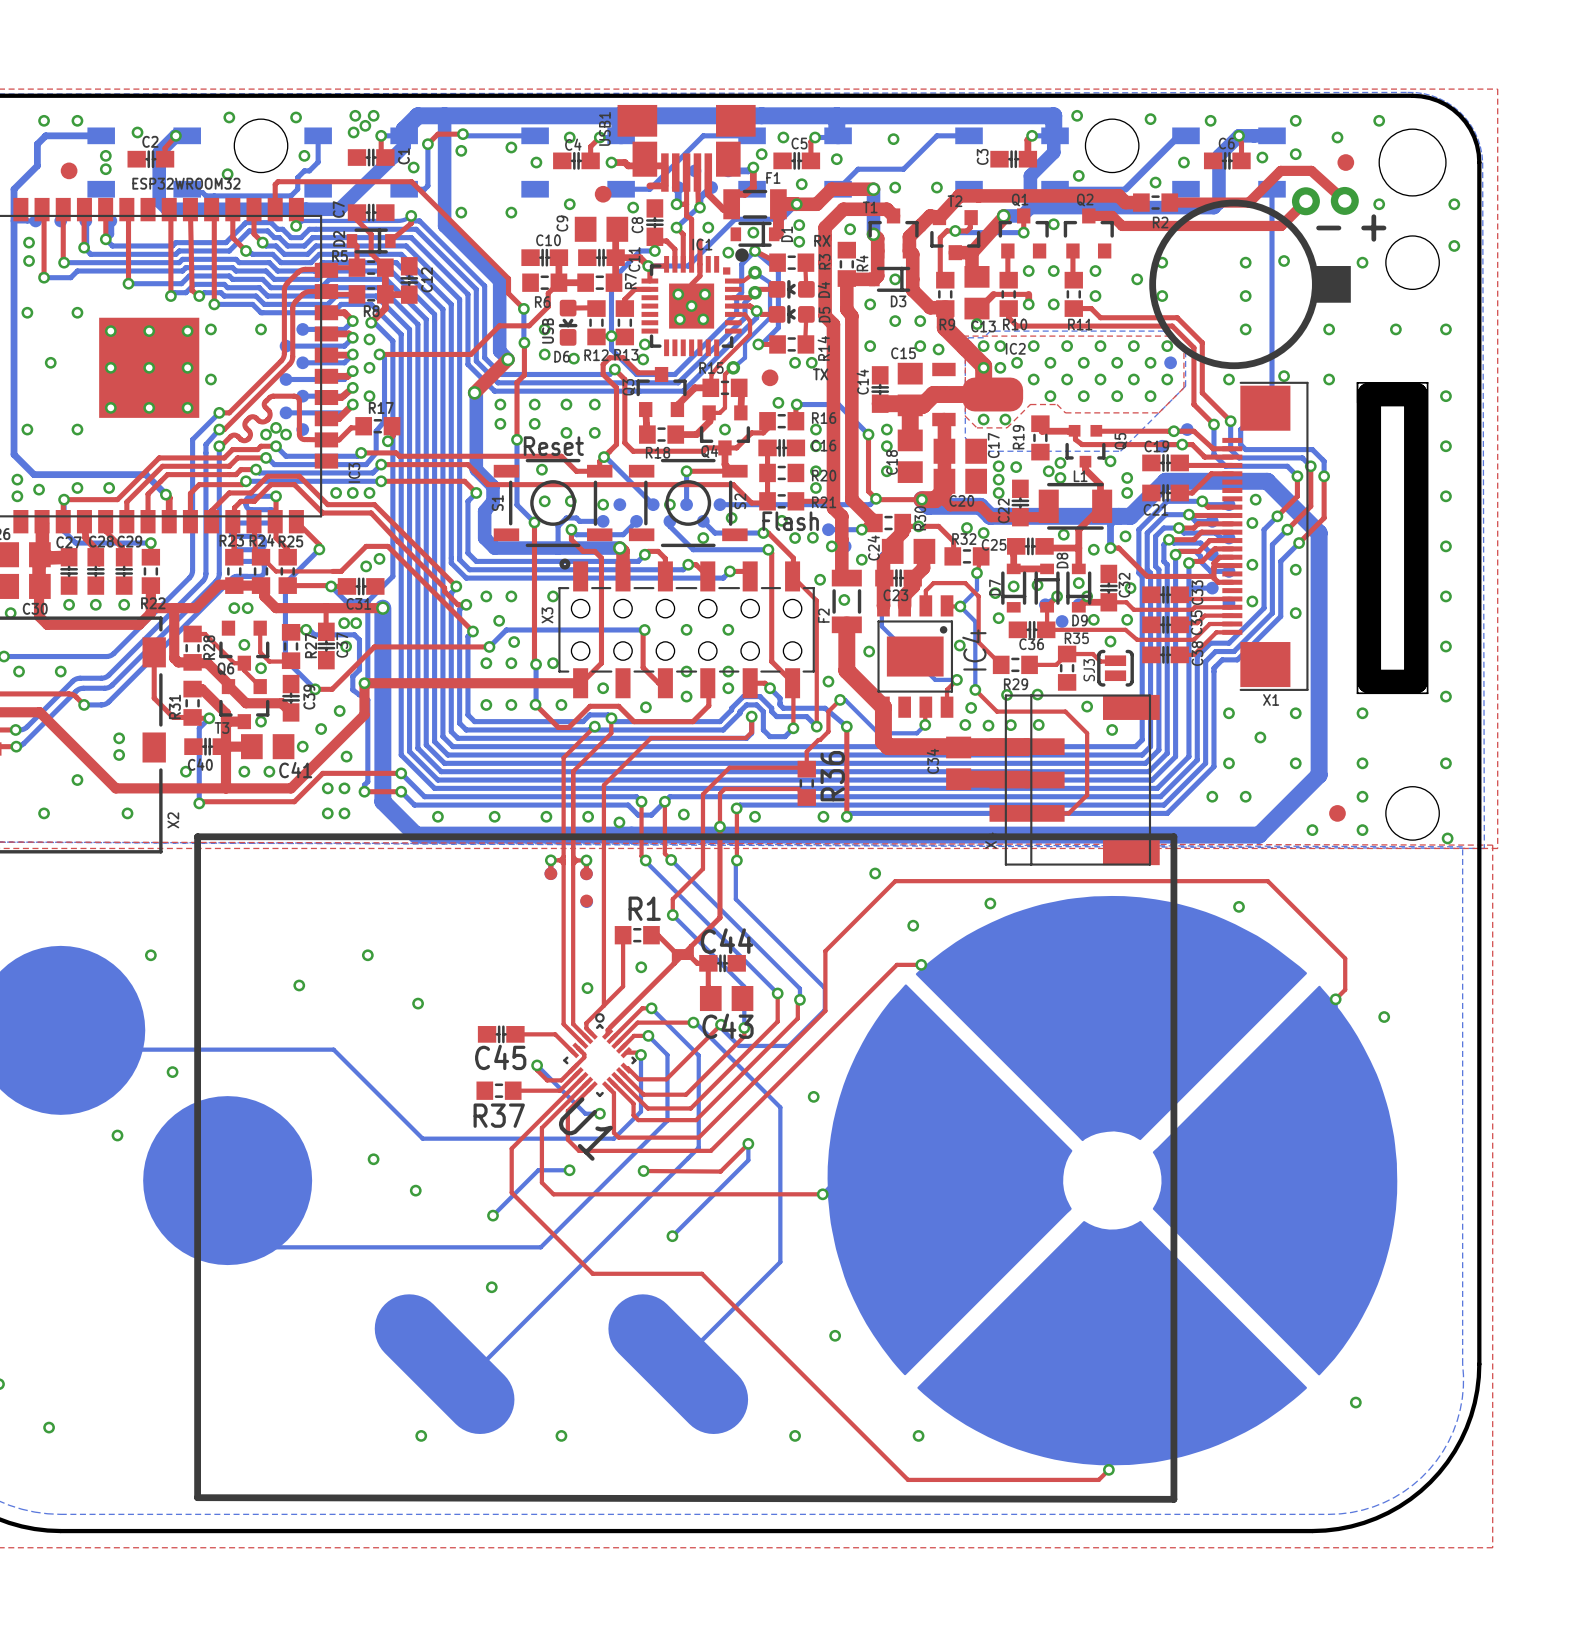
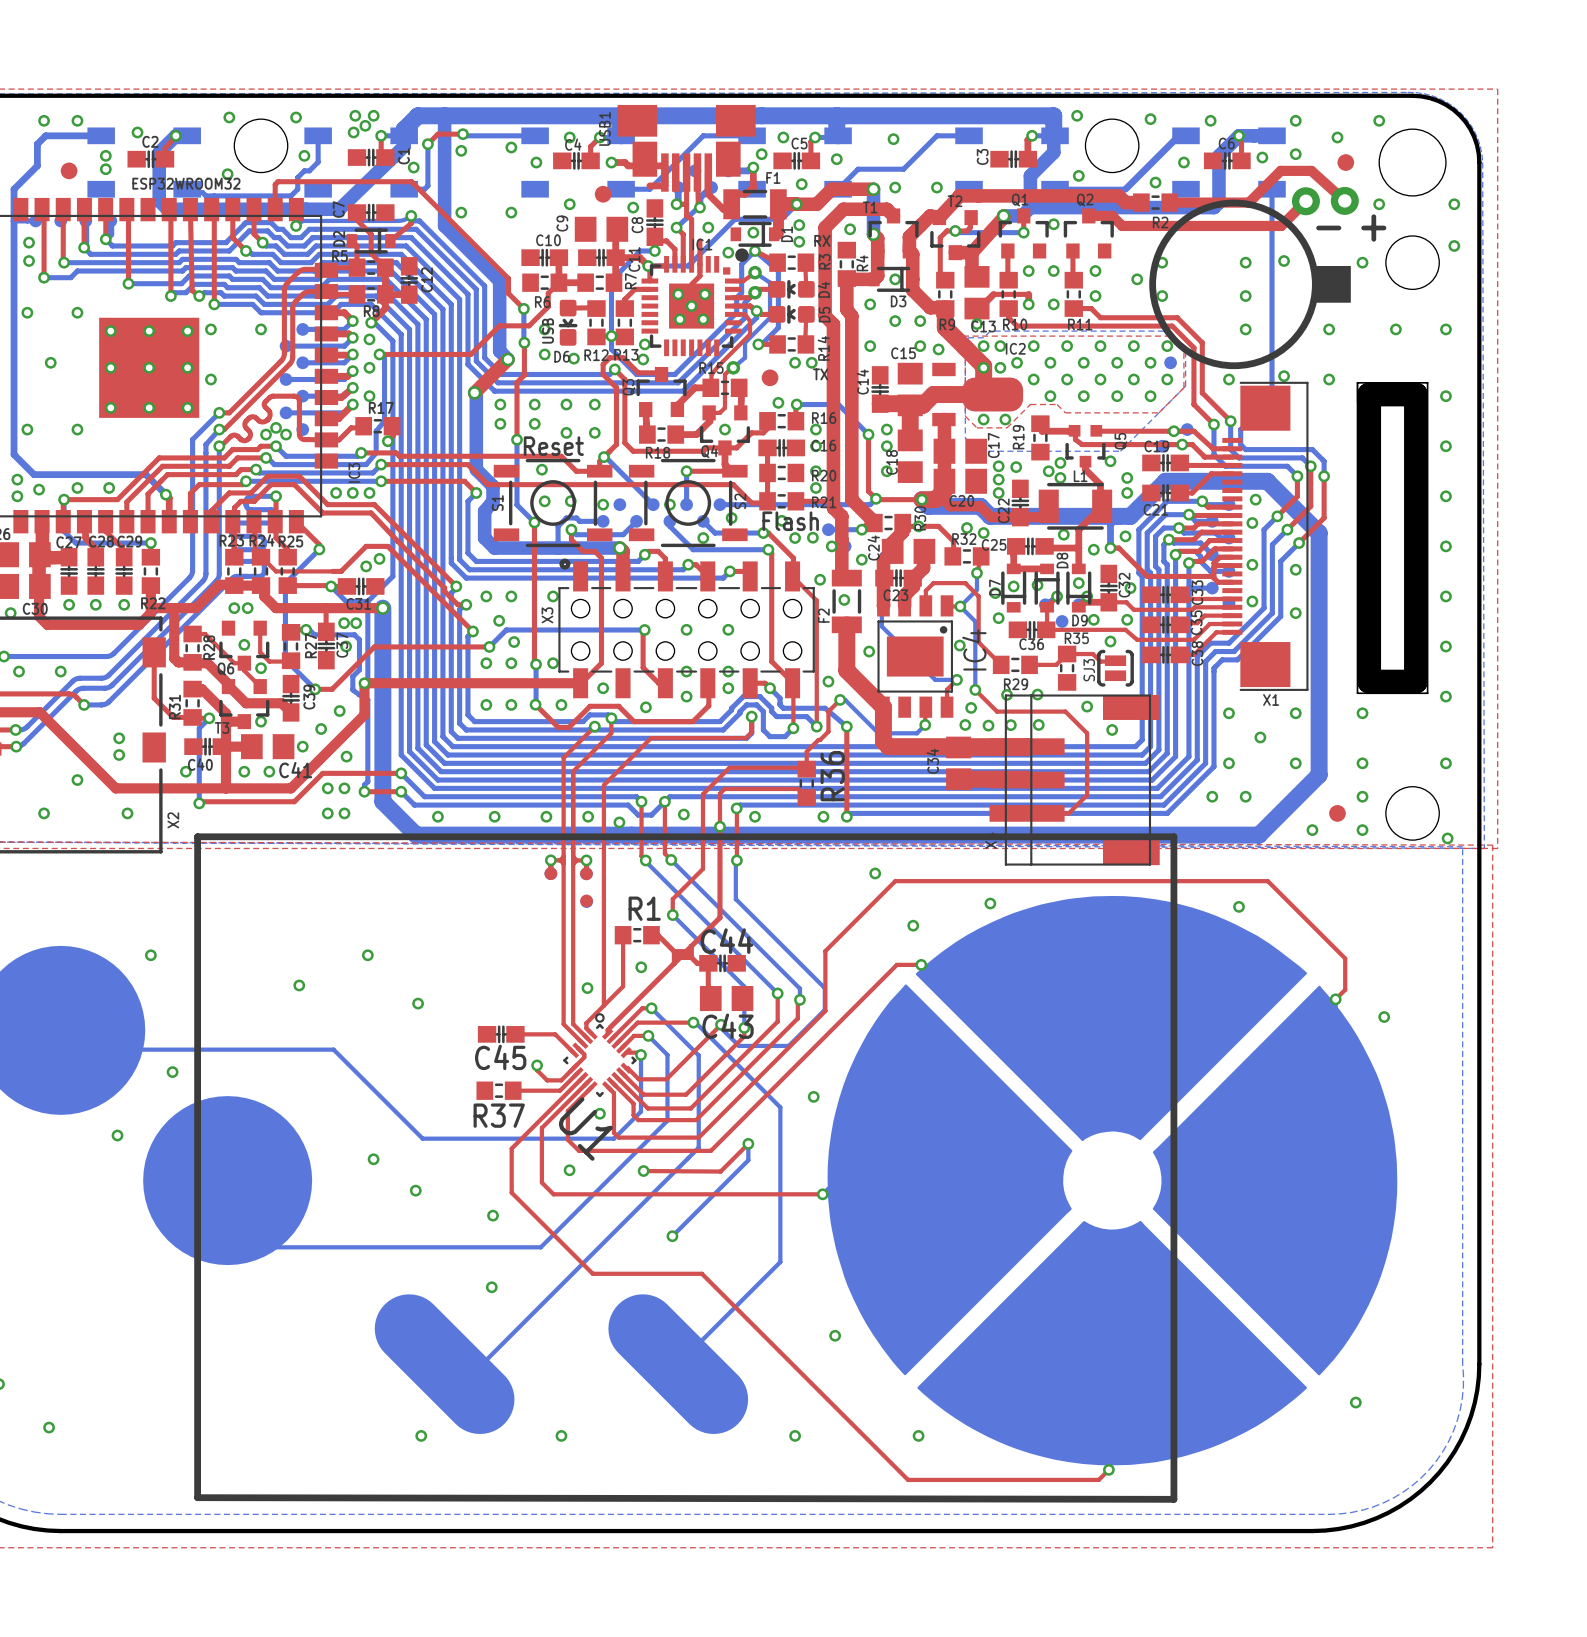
bottom track: (537, 1065) (585, 1113) (599, 1113) -> none
bottom track: (569, 1170) (538, 1170) (493, 1215) -> none

